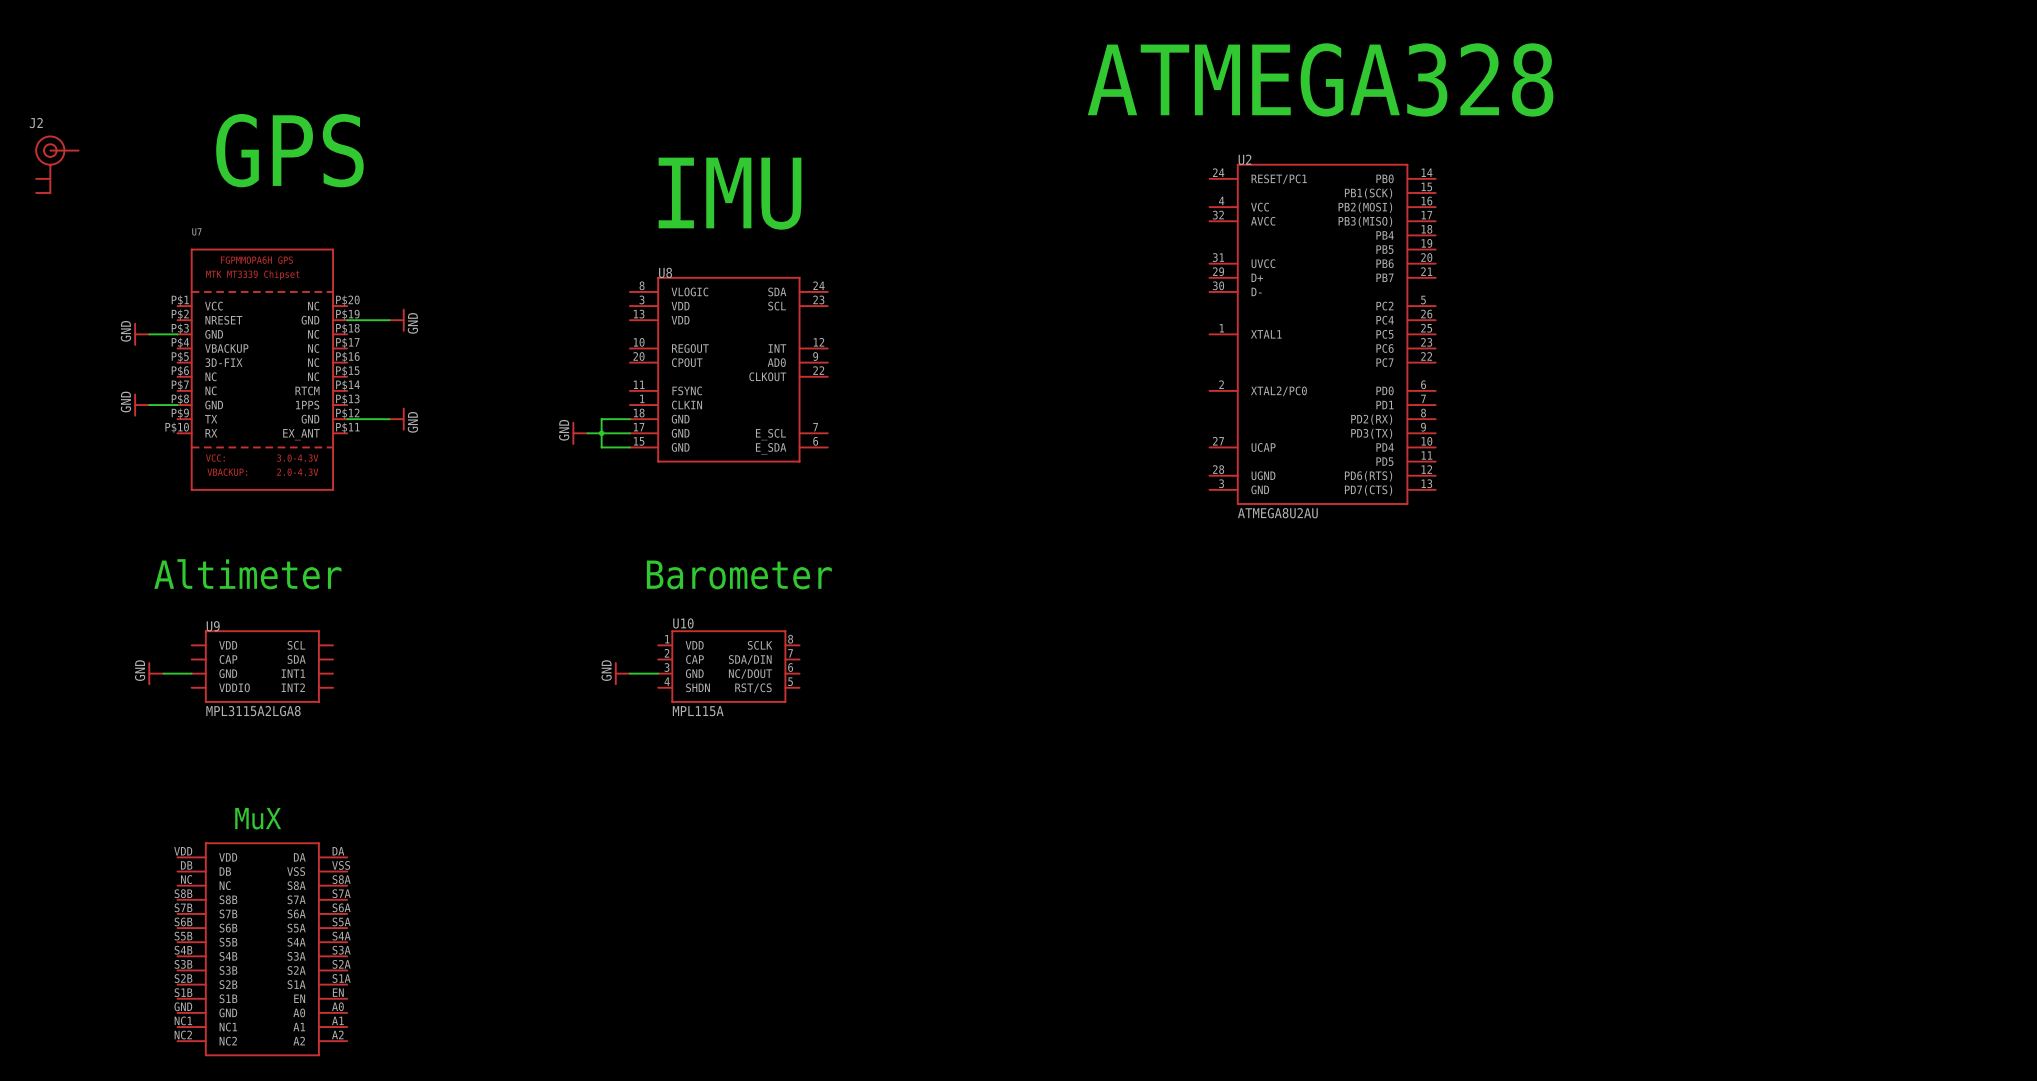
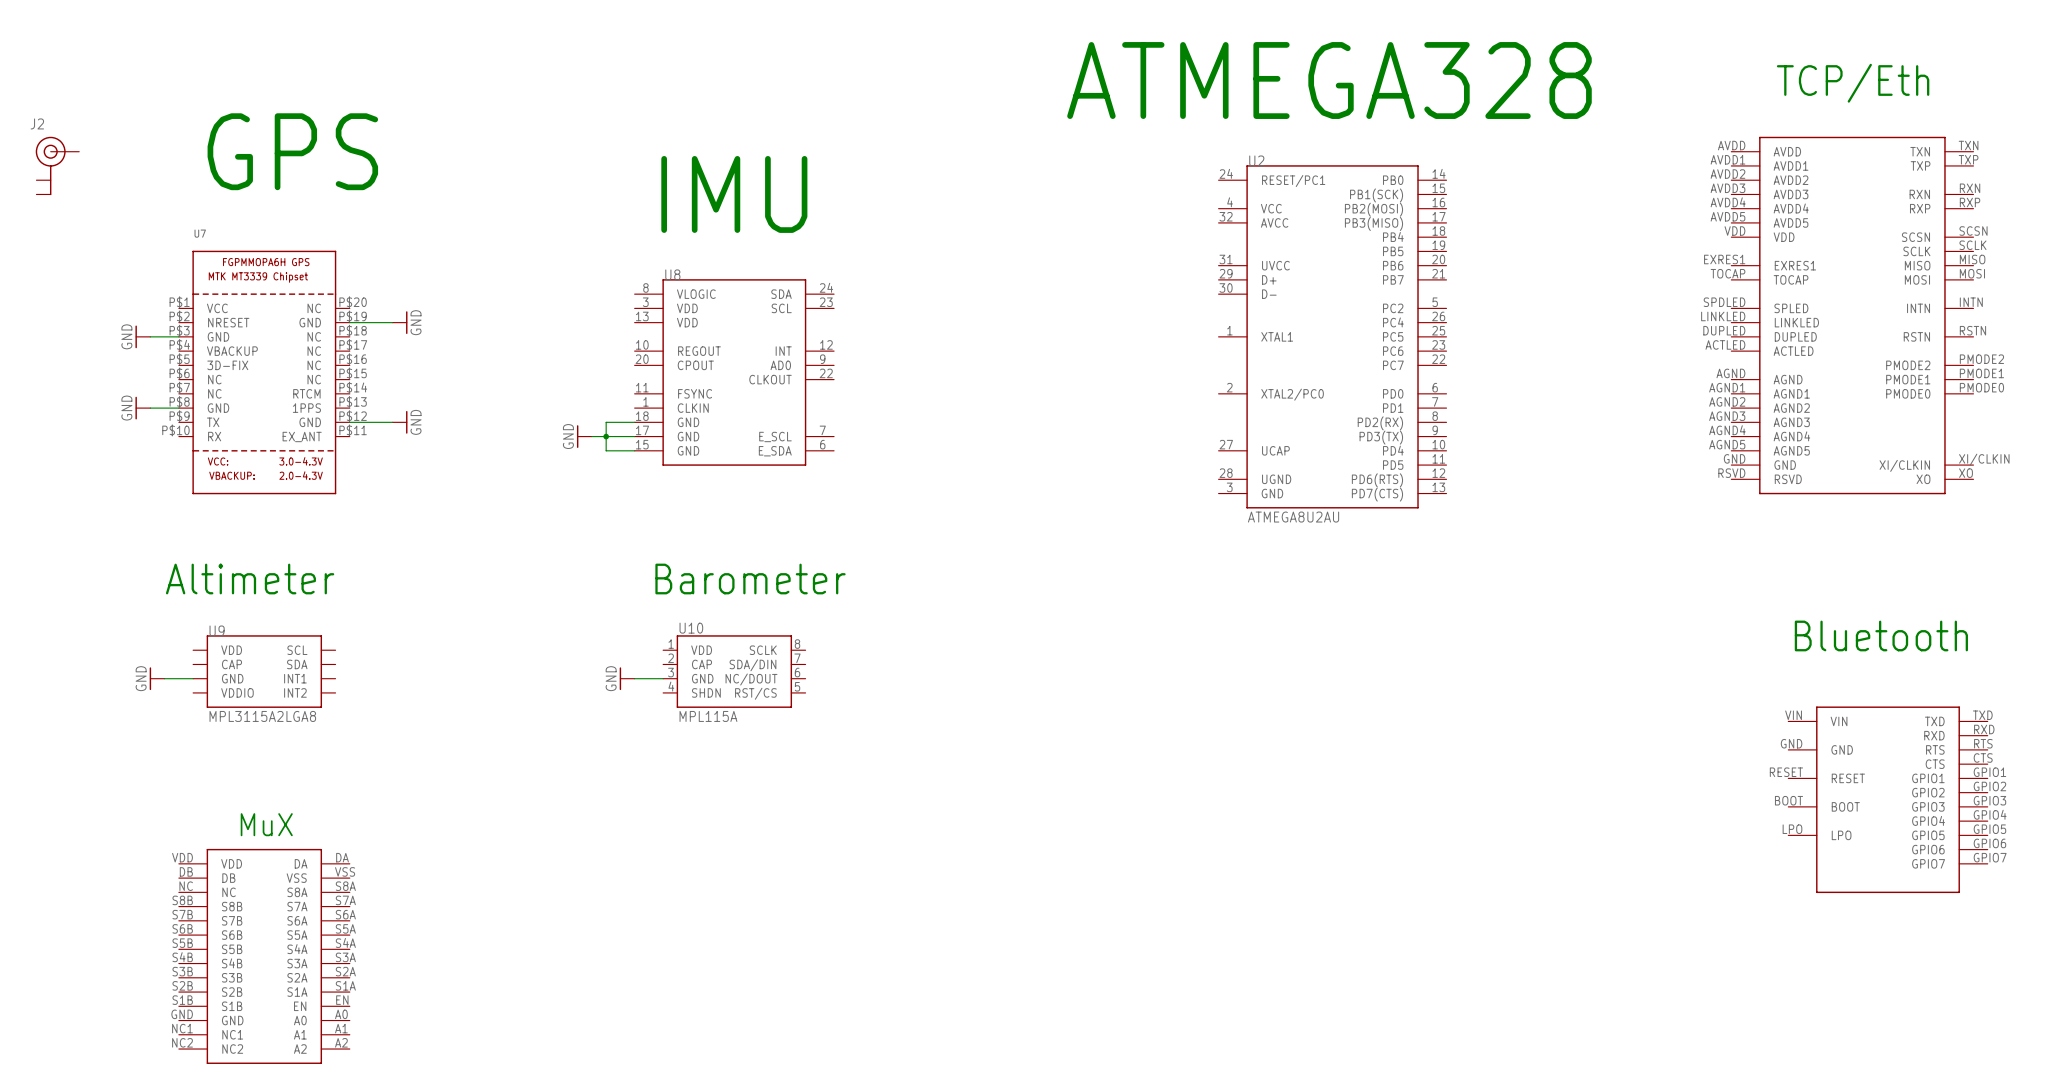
text: none -> TCP/Eth (1853, 83)
part: none -> (1852, 315)
text: none -> Bluetooth (1881, 635)
part: none -> (1888, 799)

